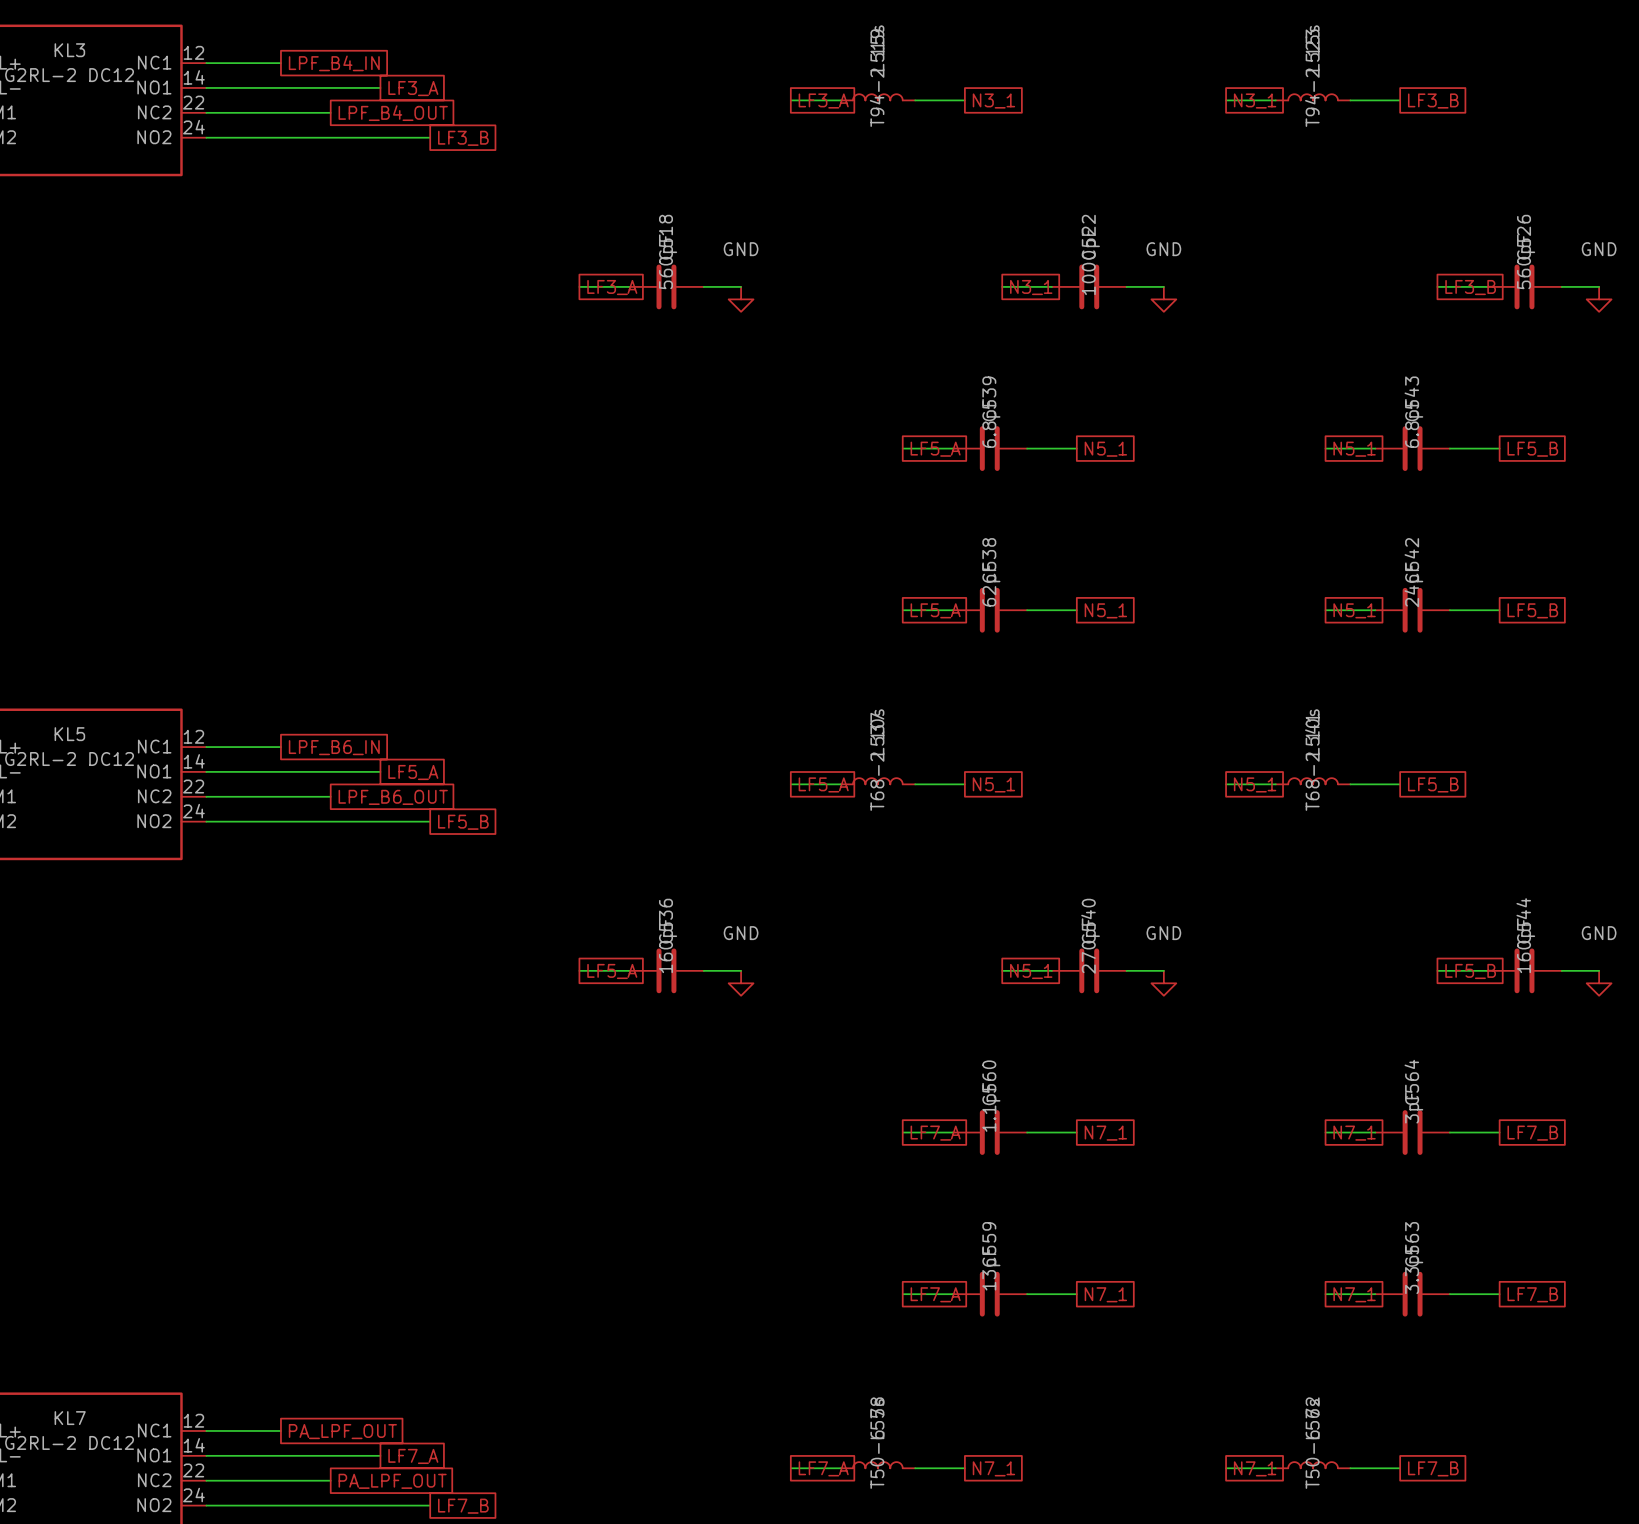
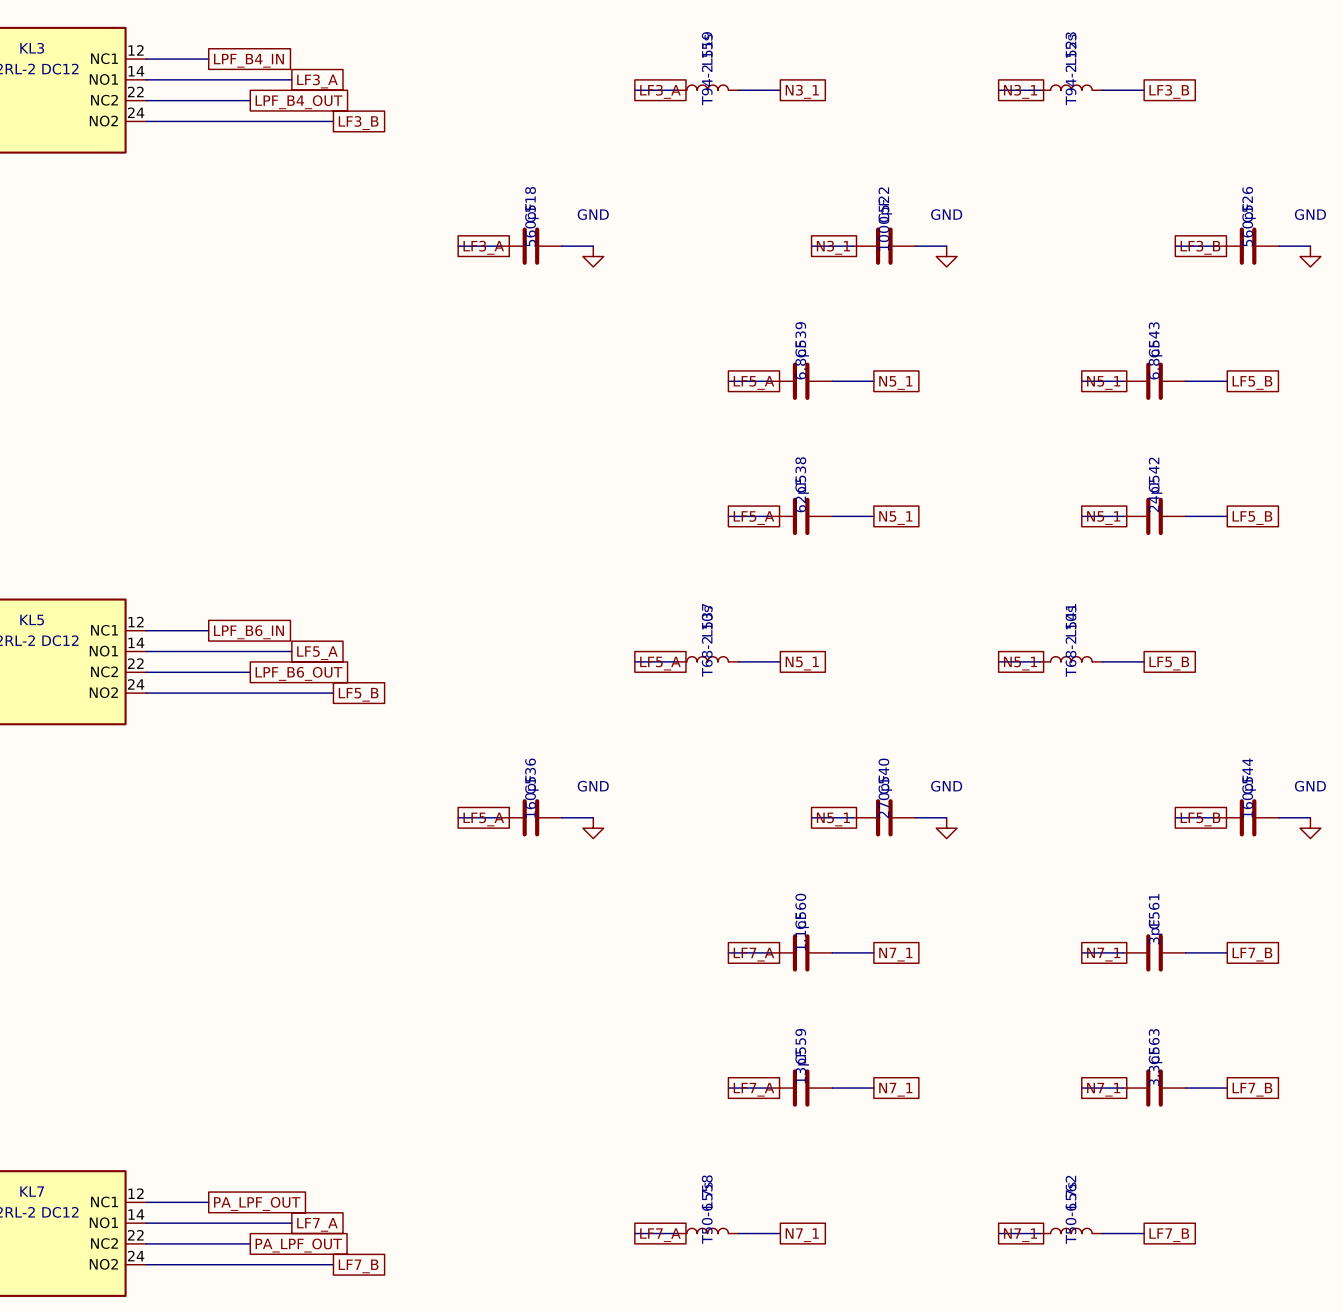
C564 name: C564 (1411, 1082) -> C561 (1154, 911)

